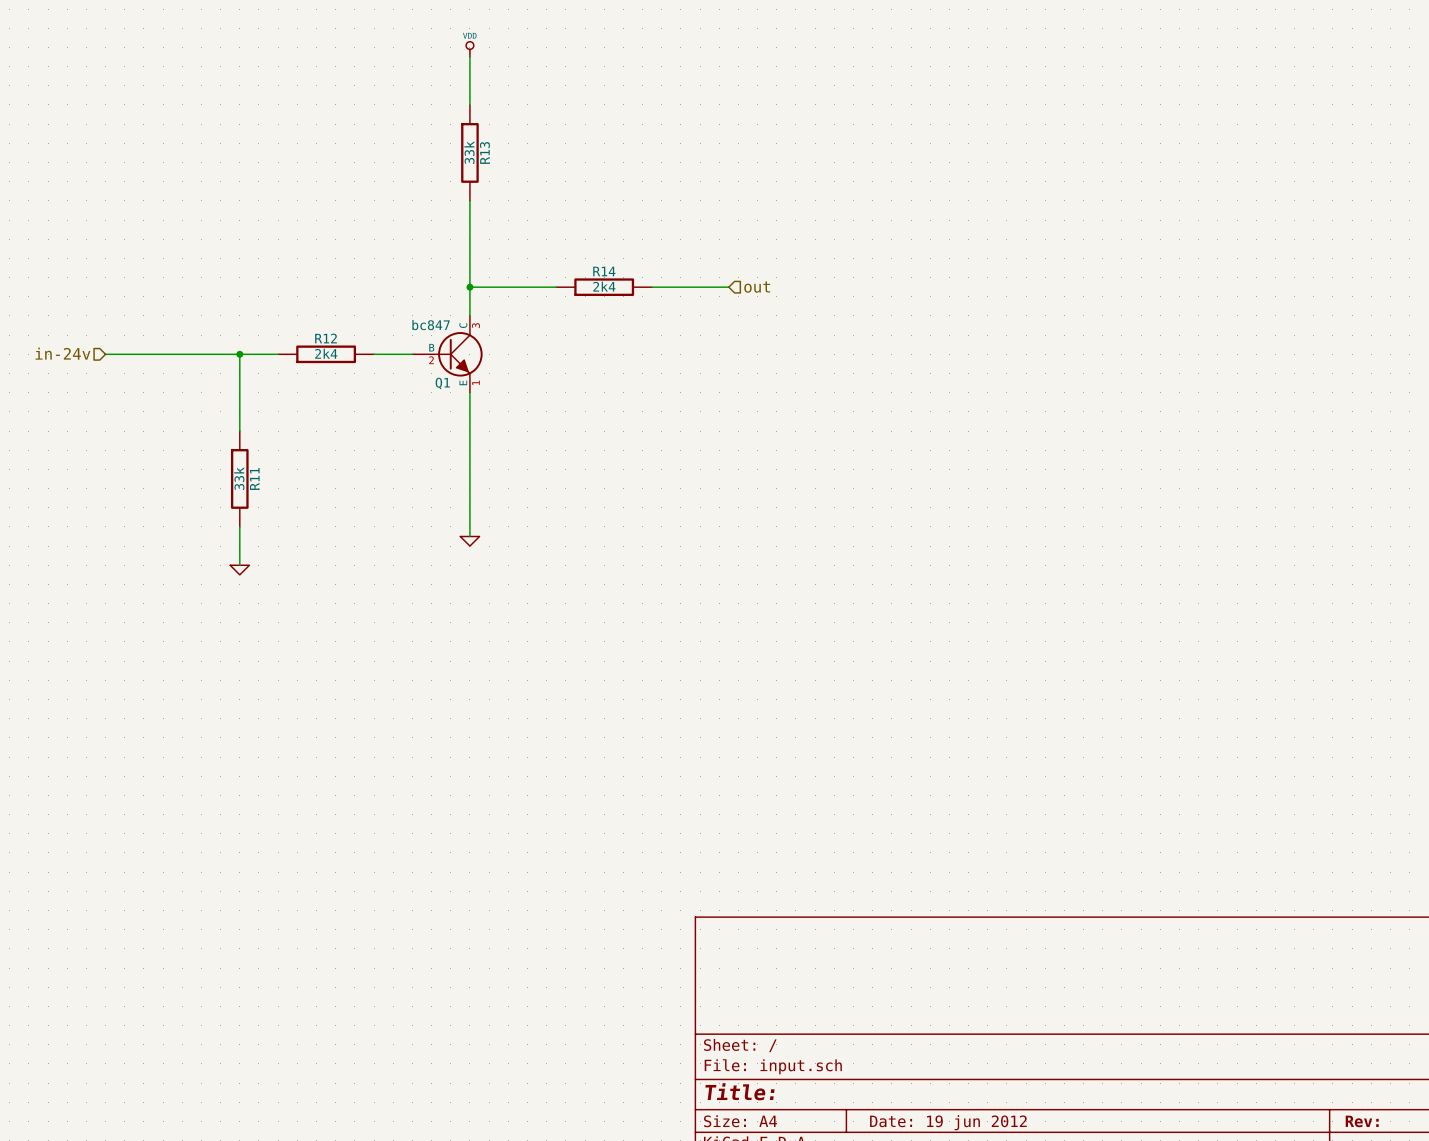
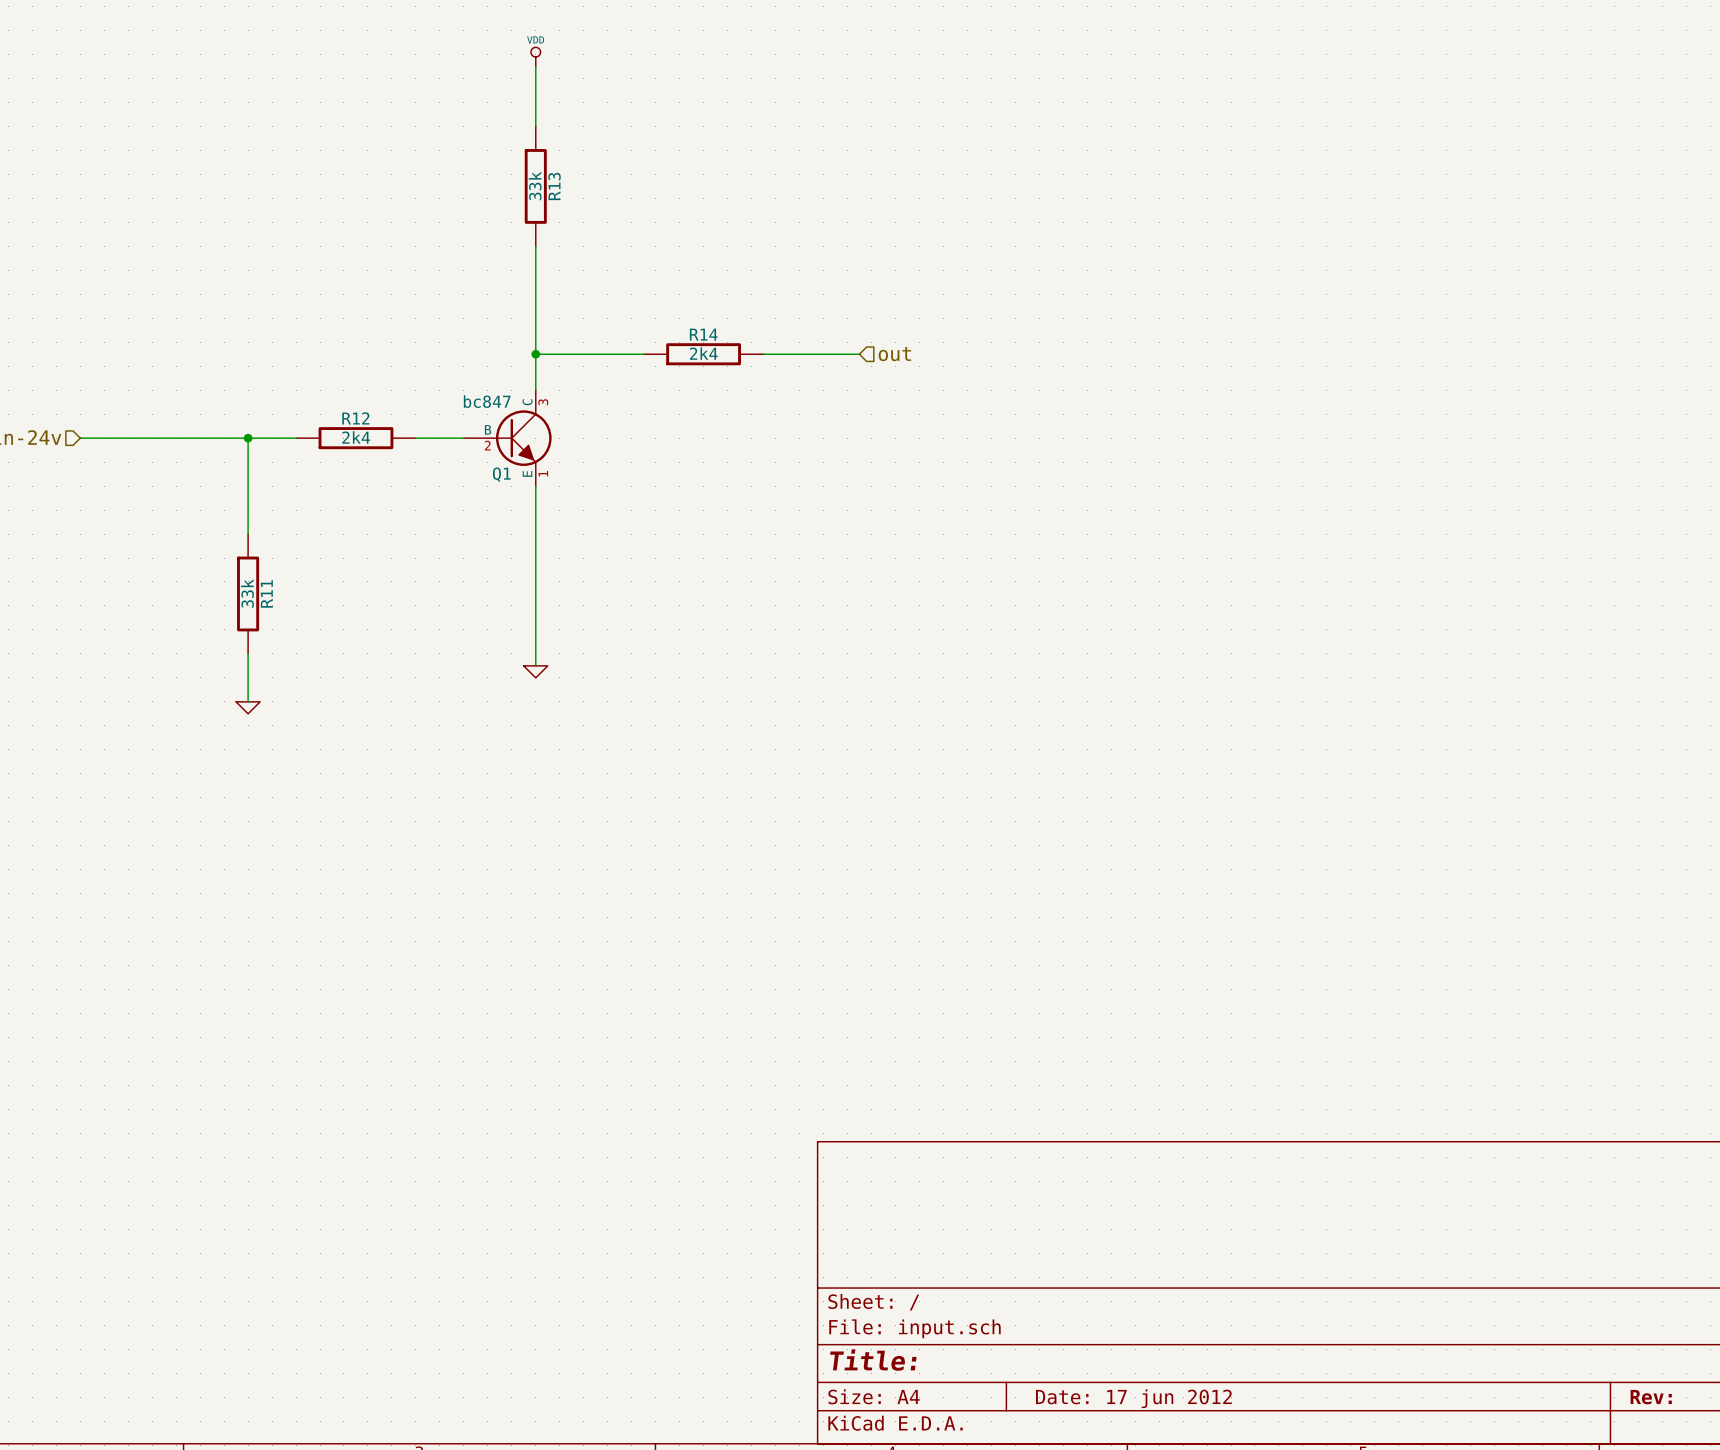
title block: Date: 19 jun 2012 (948, 1122) -> Date: 17 jun 2012 (1133, 1398)

